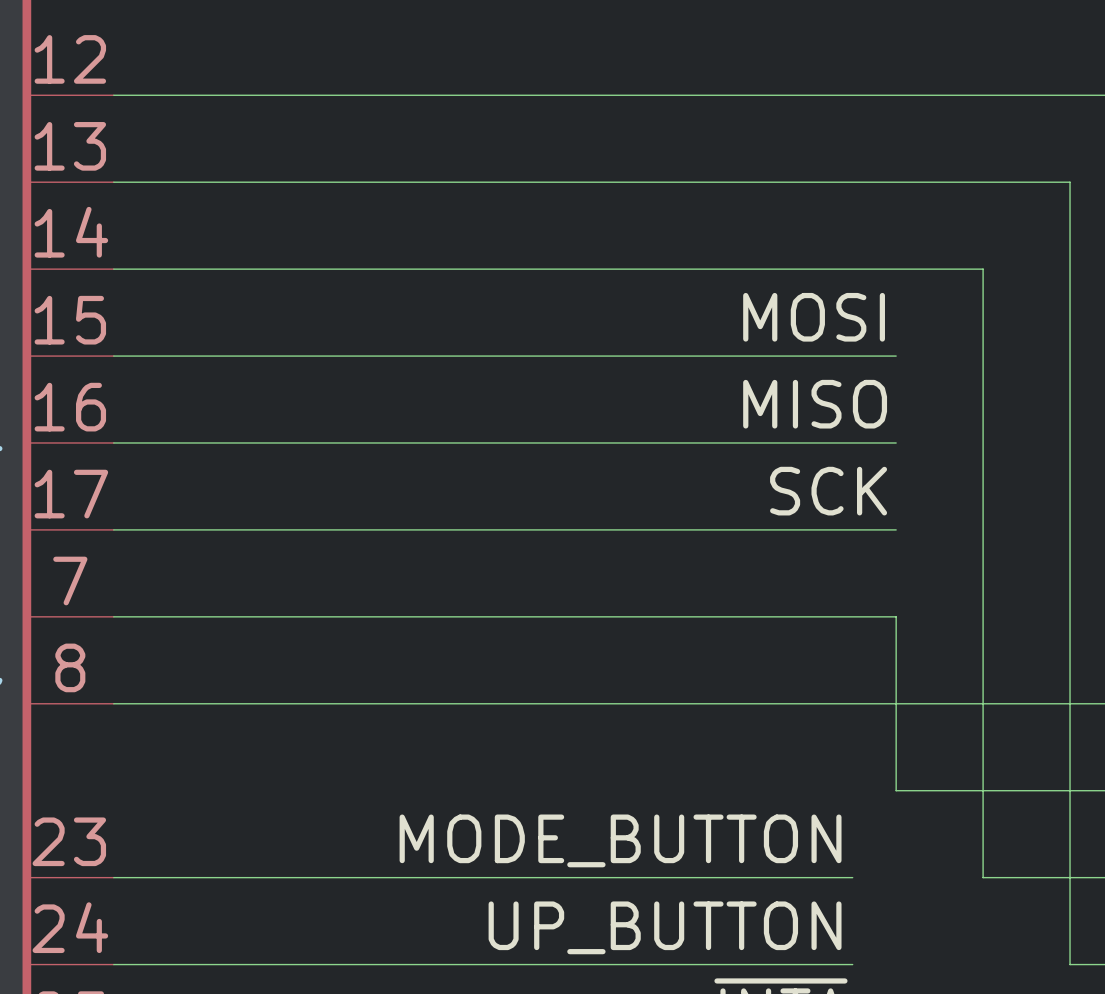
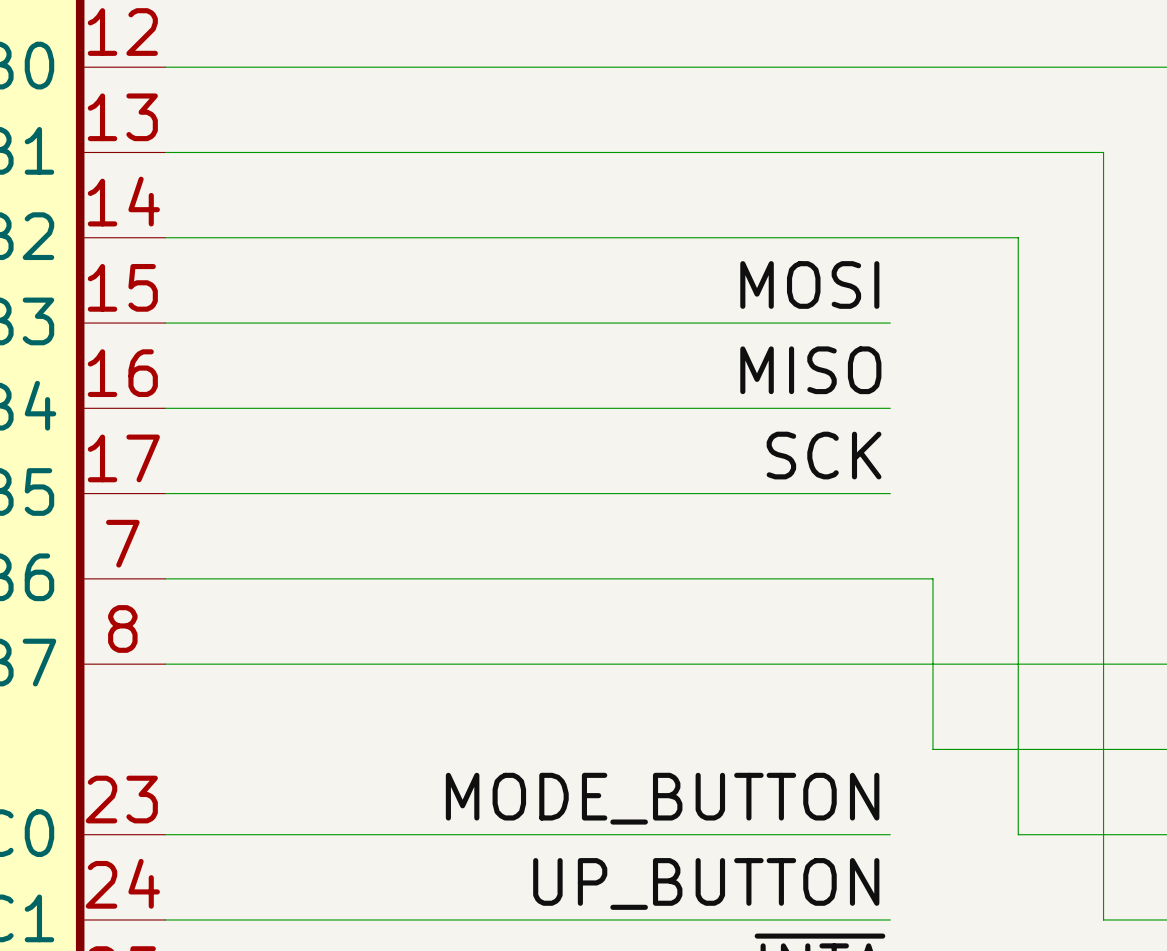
label position: MOSI (814, 317) -> MOSI (809, 284)
wire: (852, 356) (896, 356) -> none
label position: MISO (815, 404) -> MISO (810, 370)
wire: (852, 442) (896, 442) -> none
label position: SCK (828, 491) -> SCK (824, 455)
wire: (852, 529) (896, 529) -> none

